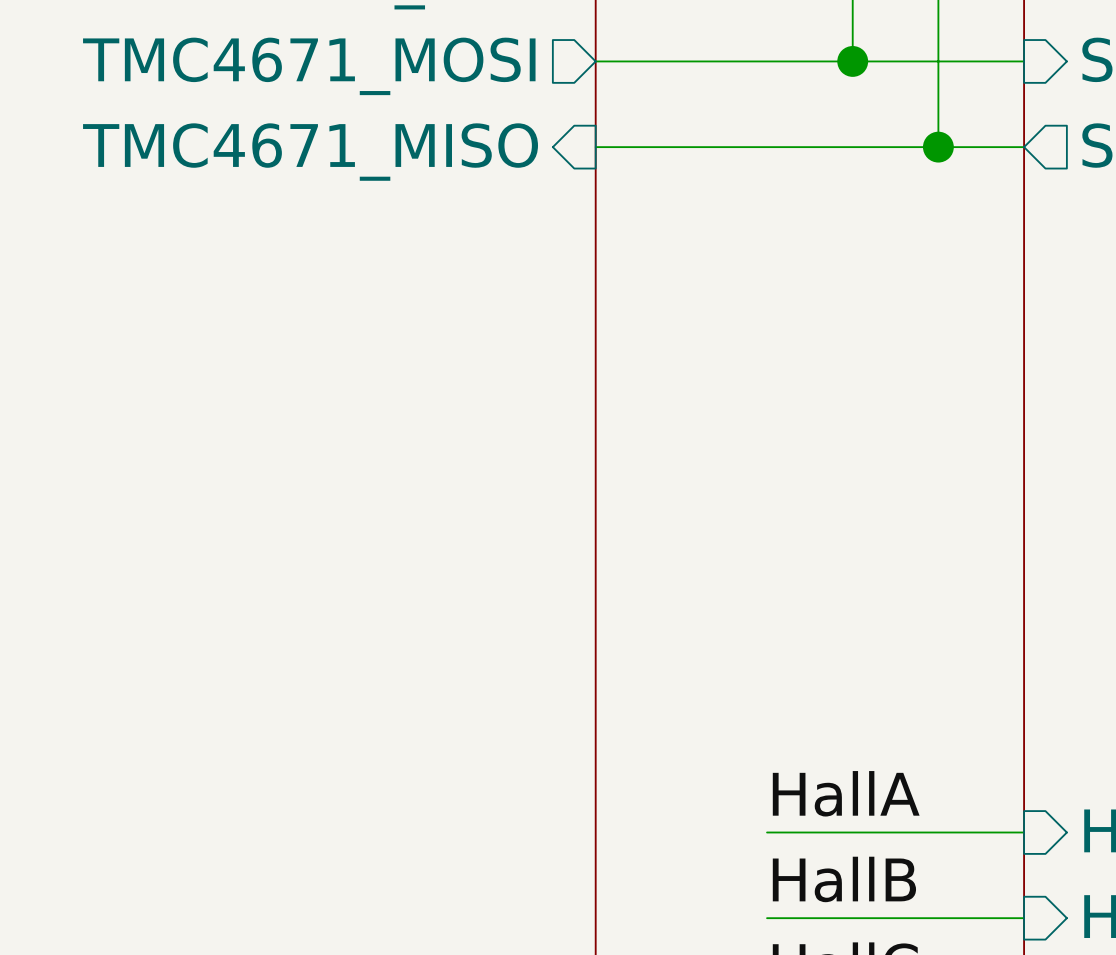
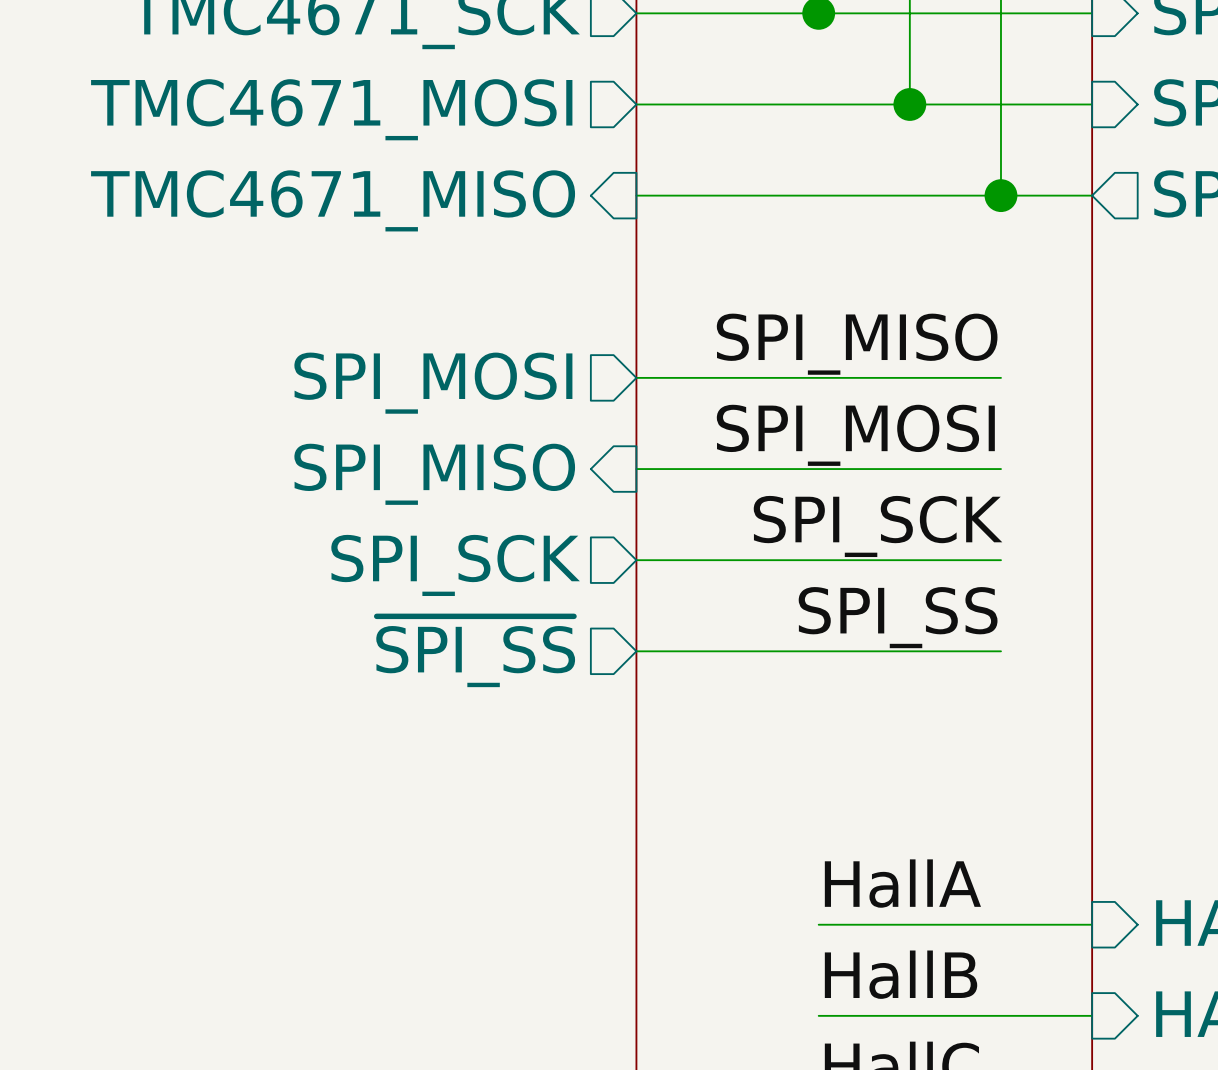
label: none -> SPI_MISO (857, 344)
wire: none -> (636, 377) (1000, 377)
sheet pin: none -> SPI_MOSI (433, 383)
label: none -> SPI_MOSI (855, 435)
wire: none -> (636, 469) (1000, 469)
sheet pin: none -> SPI_MISO (434, 474)
label: none -> SPI_SCK (878, 526)
wire: none -> (636, 560) (1000, 560)
sheet pin: none -> SPI_SCK (455, 565)
label: none -> SPI_SS (898, 617)
sheet pin: none -> ~{SPI_SS} (475, 651)
wire: none -> (636, 651) (1000, 651)

